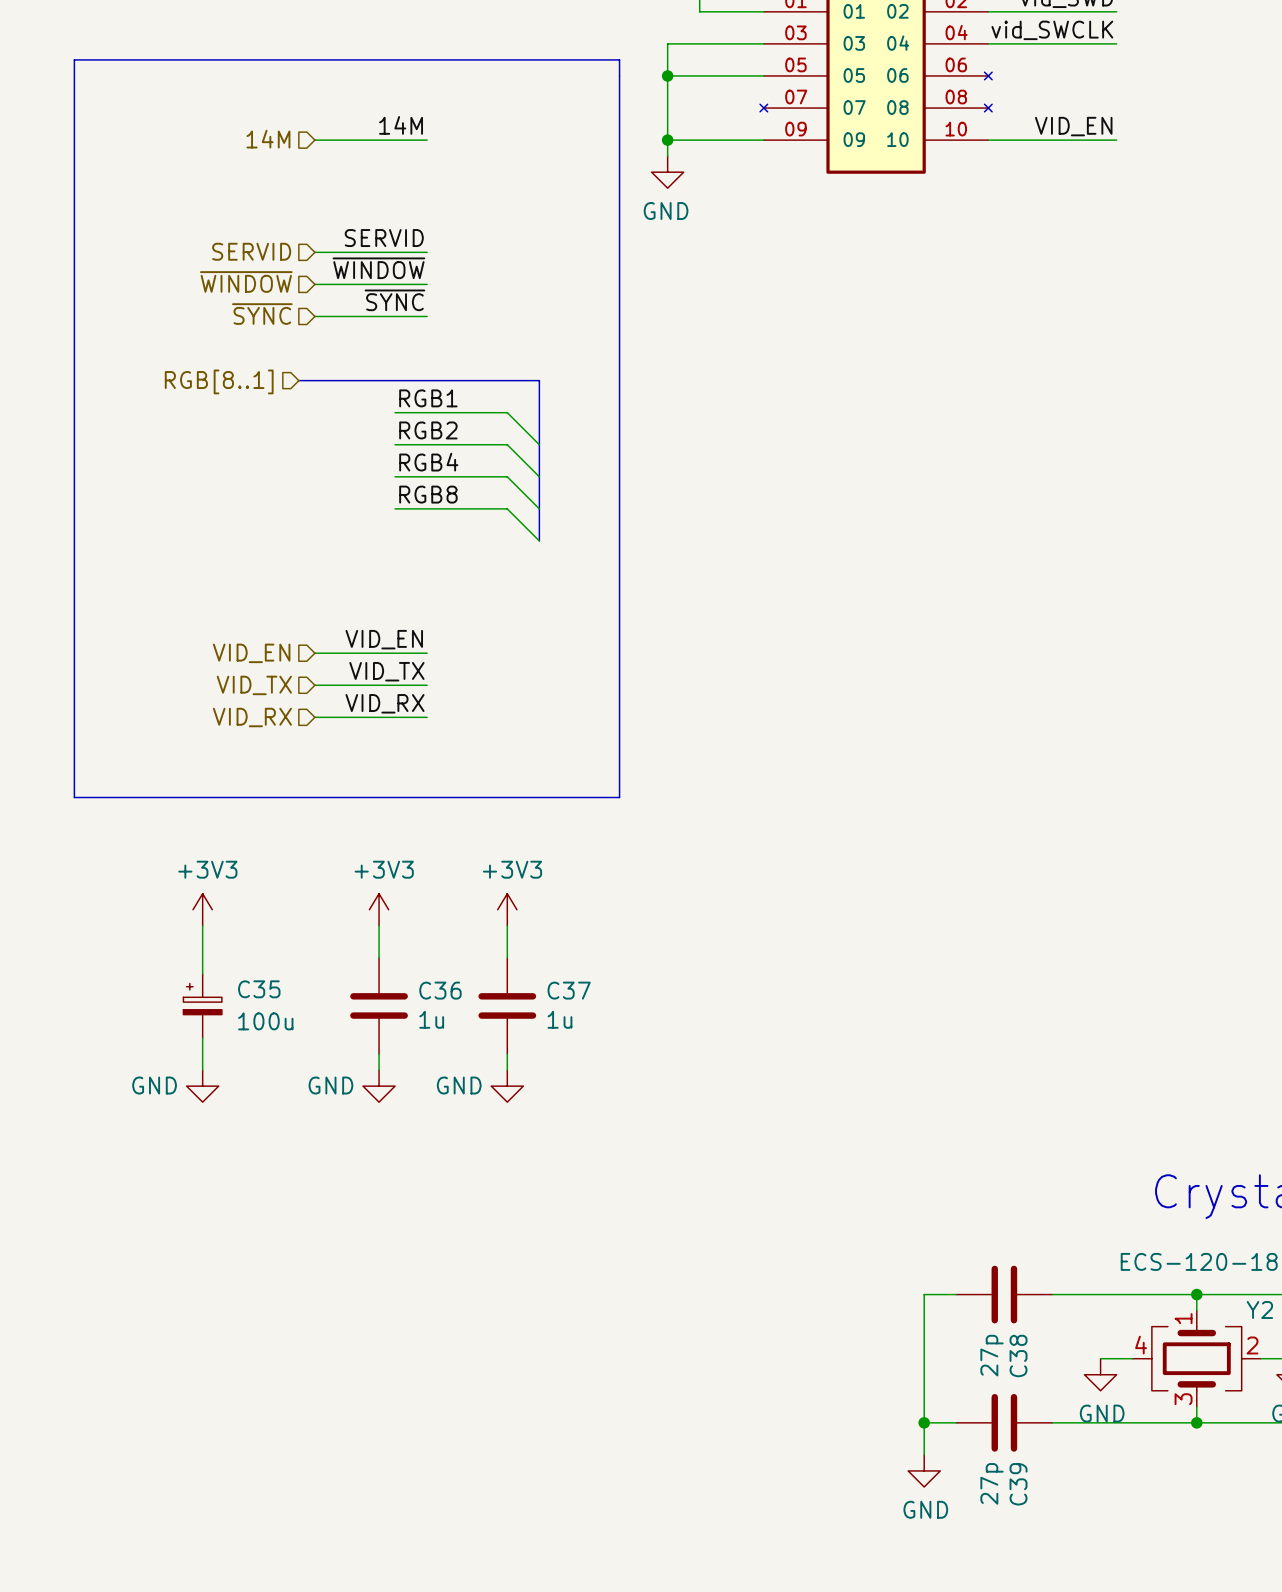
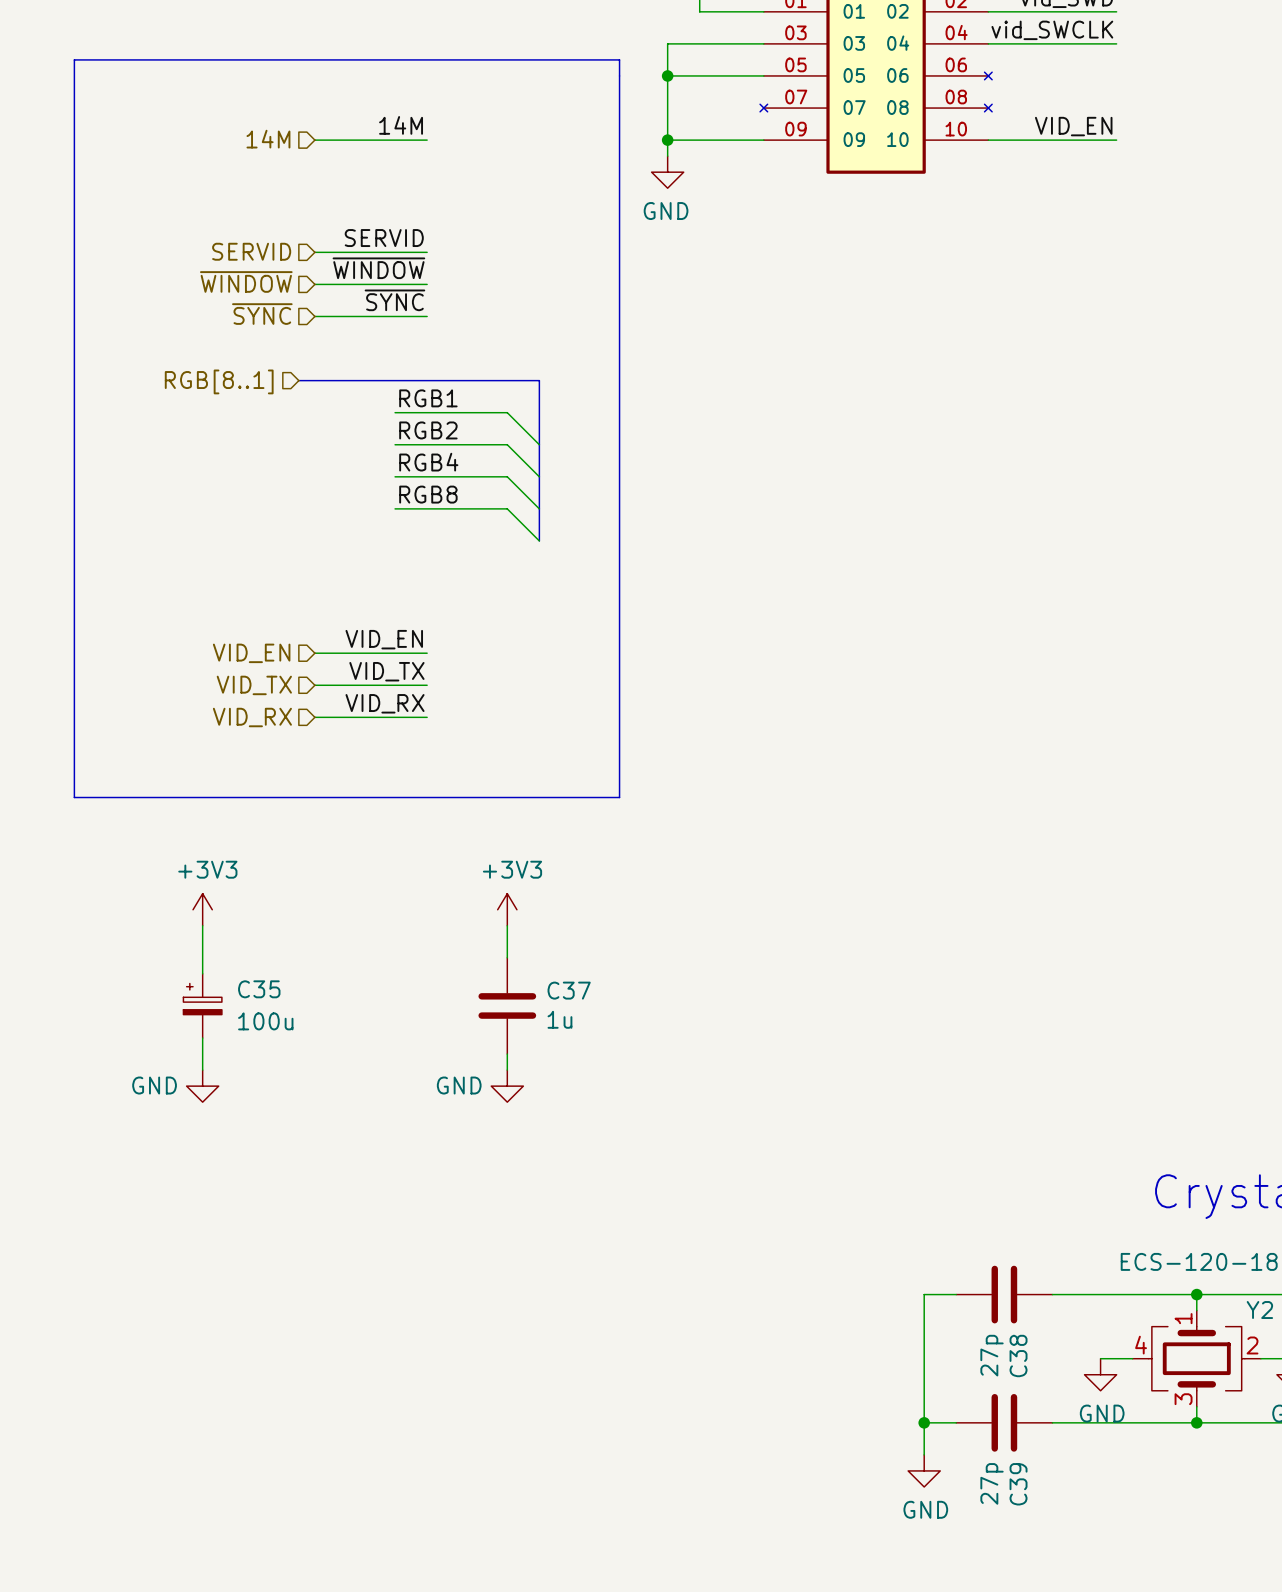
power symbol: +3V3 (379, 909) -> none
wire: (379, 925) (379, 957) -> none
C36: 1u (379, 1005) -> none
wire: (379, 1054) (379, 1070) -> none
power symbol: GND (379, 1086) -> none

